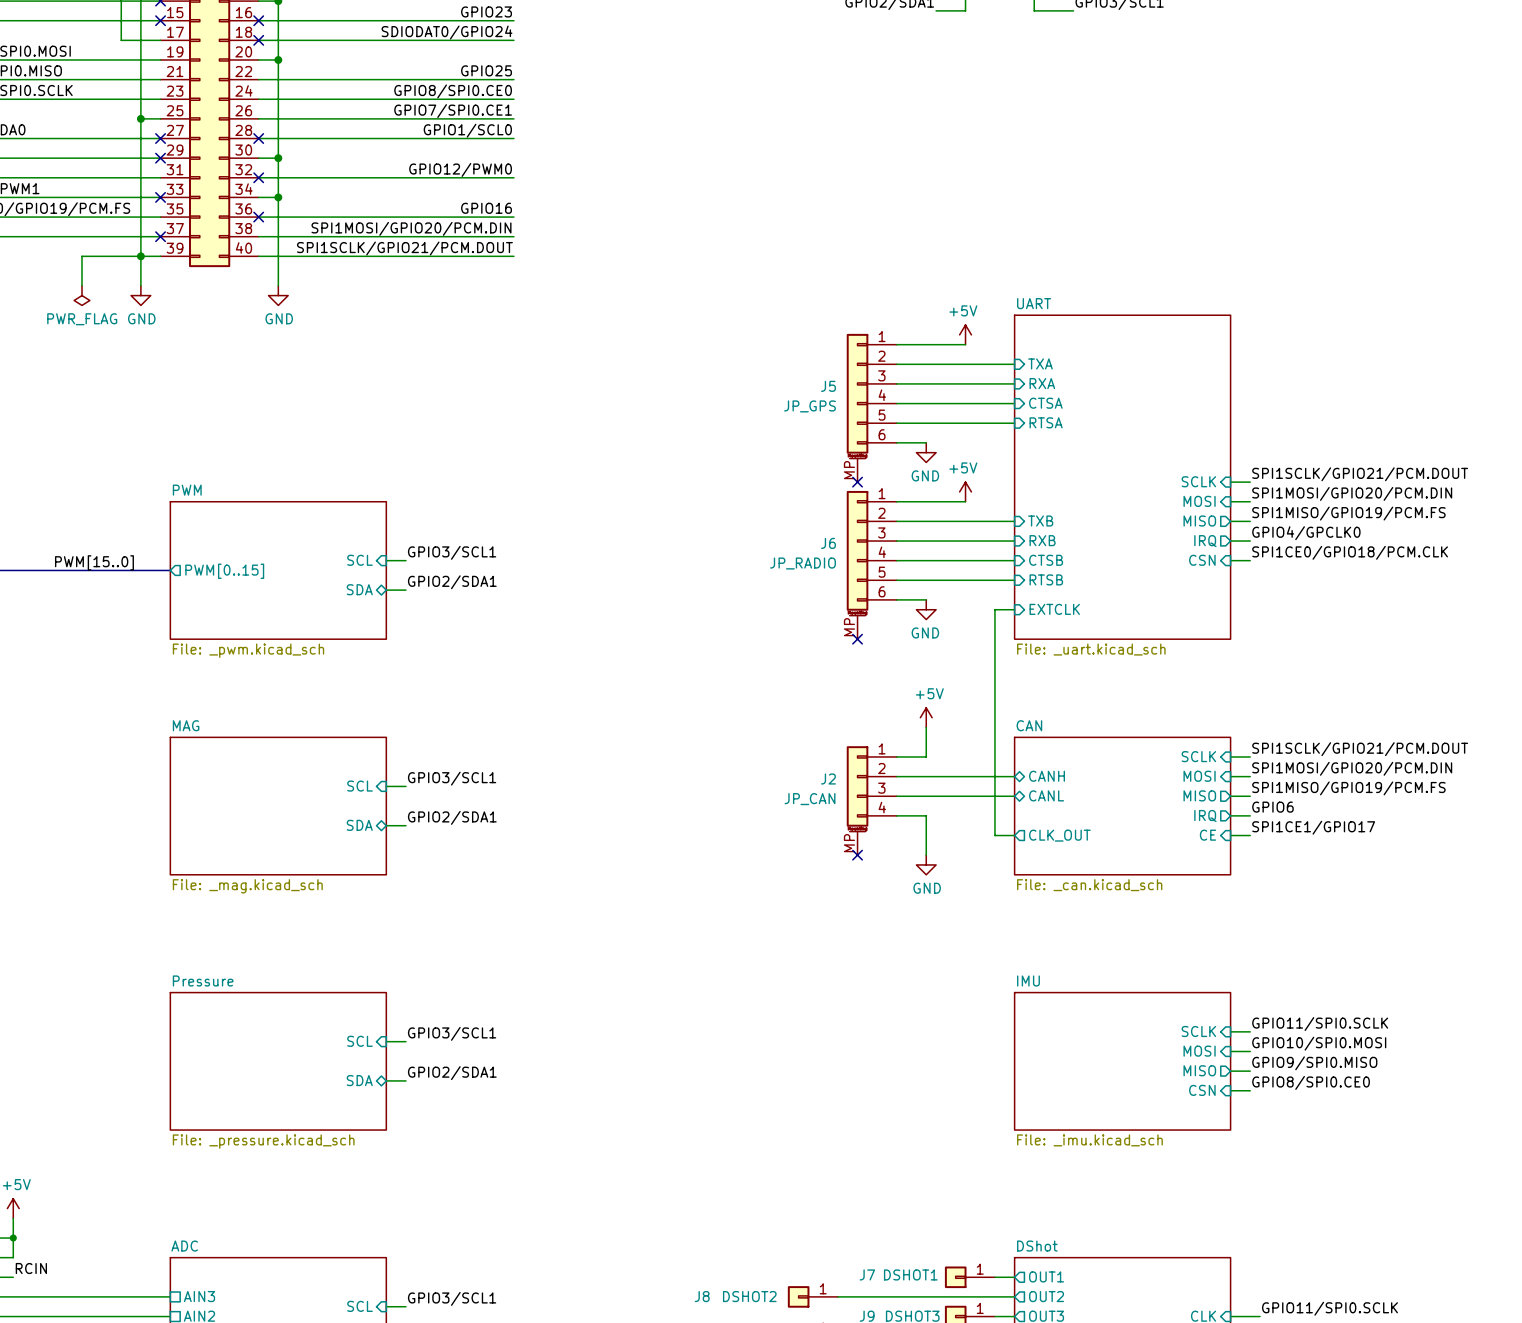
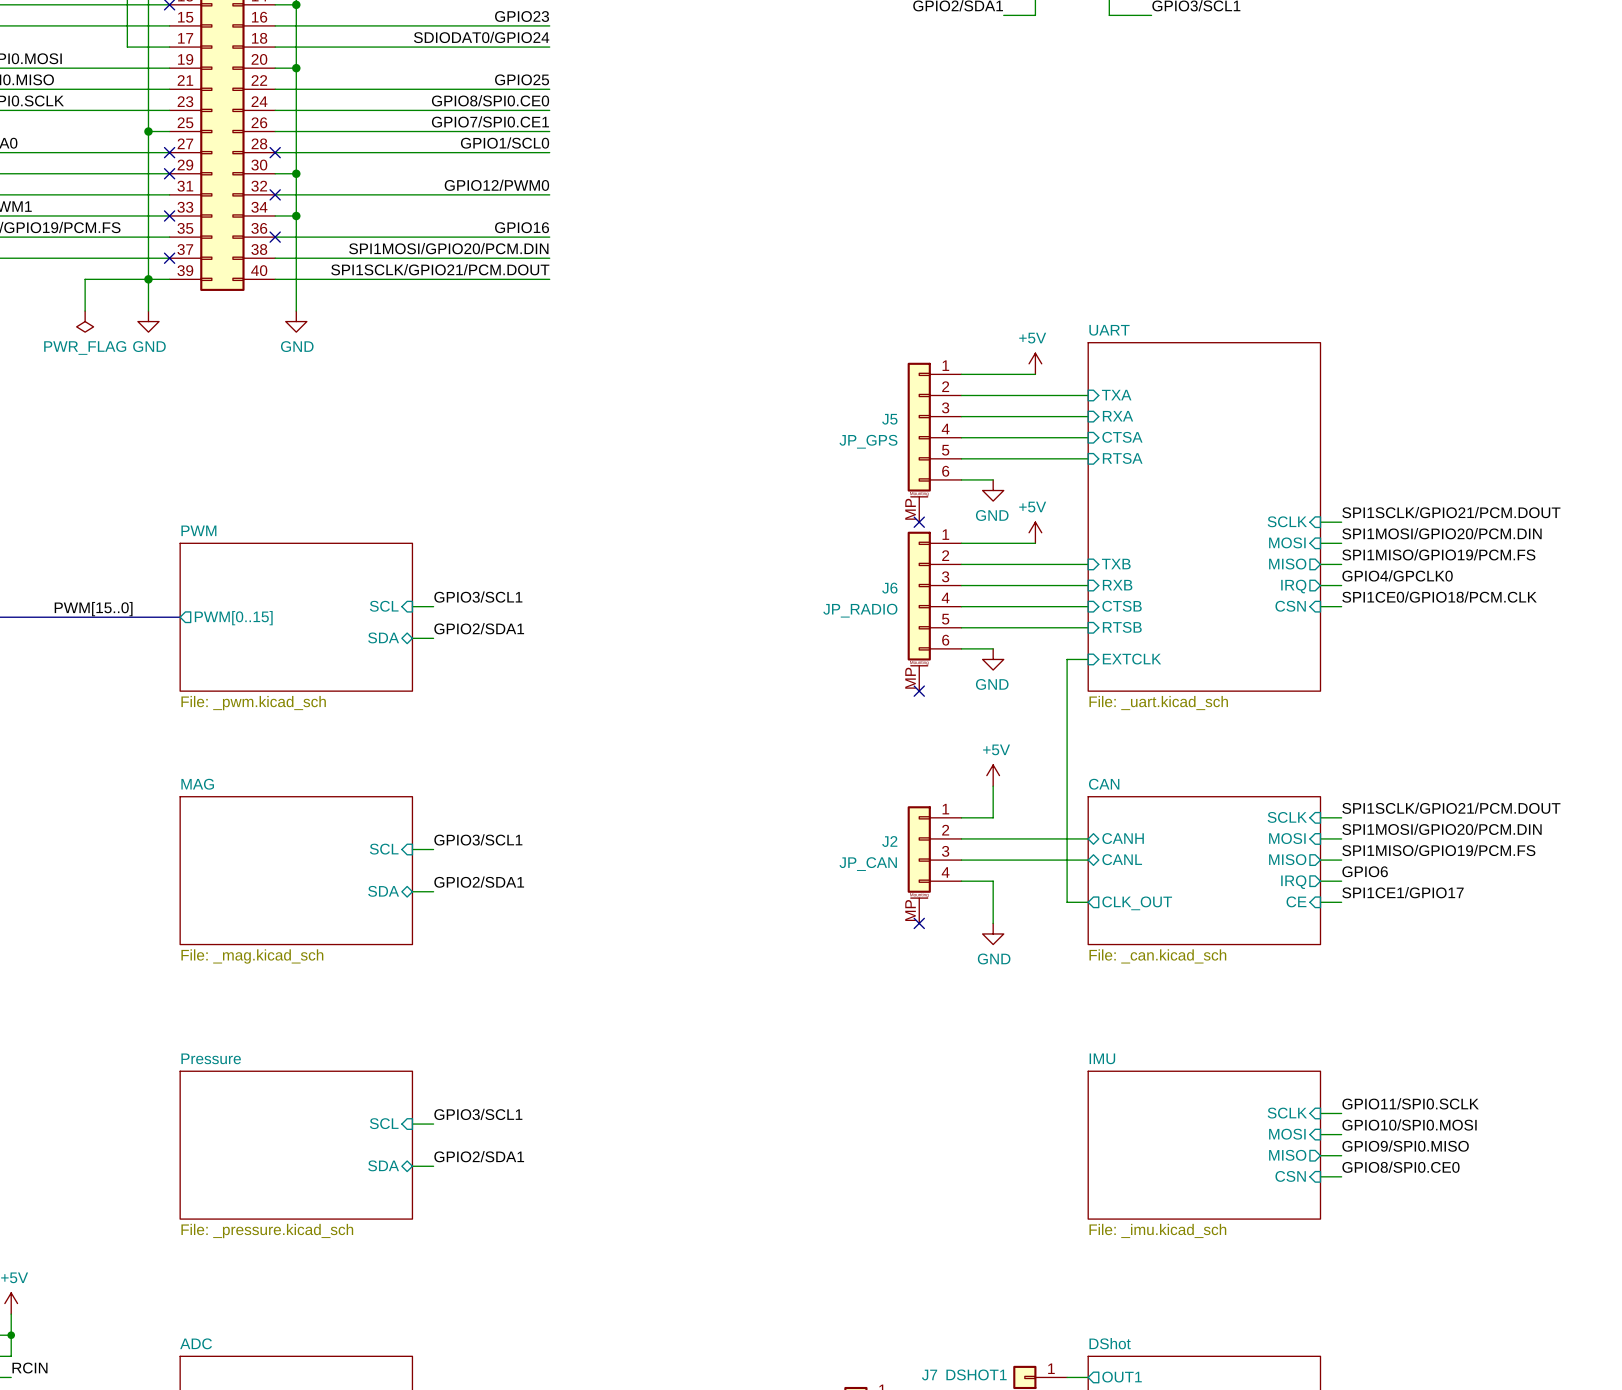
no-connect mark: (160, 20) -> none
no-connect mark: (258, 20) -> none
no-connect mark: (258, 40) -> none

